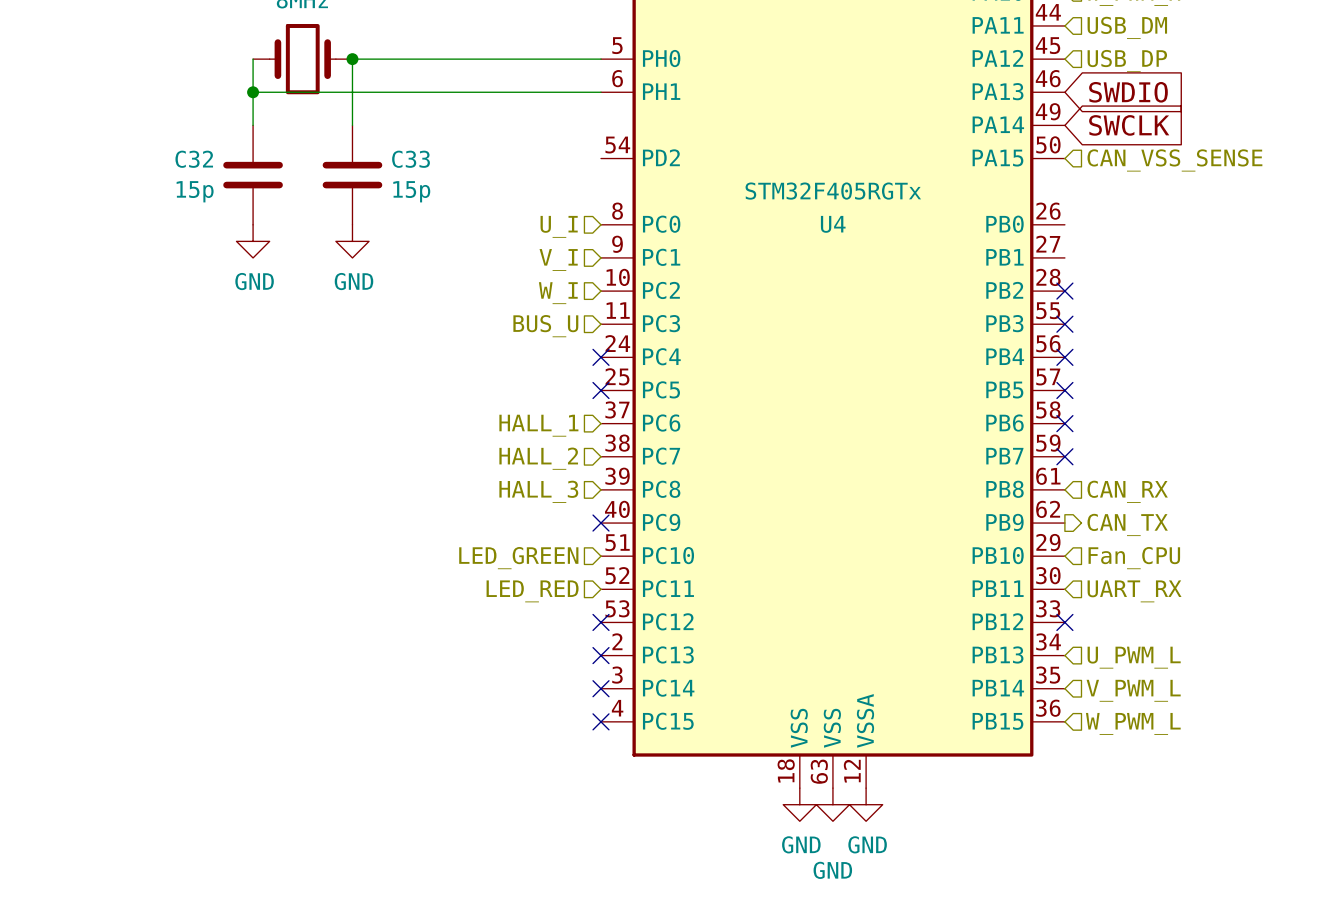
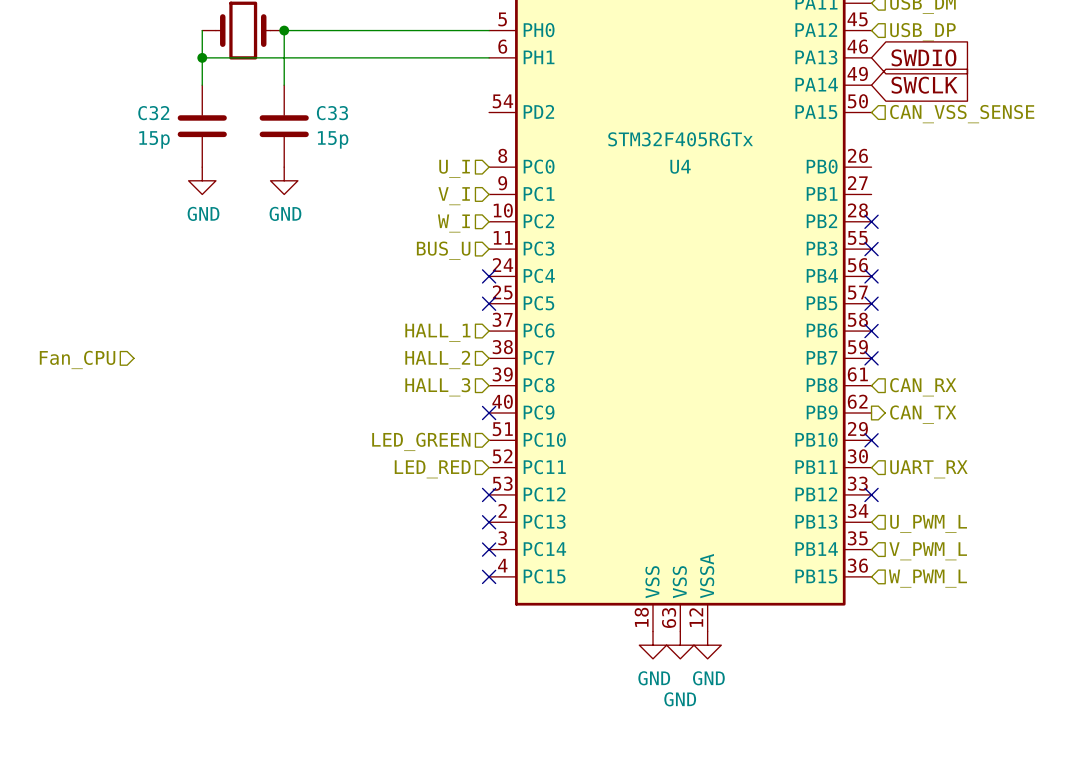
hierarchical label: none -> Fan_CPU (77, 359)
no-connect mark: none -> (871, 440)
hierarchical label: Fan_CPU (1134, 558) -> none

